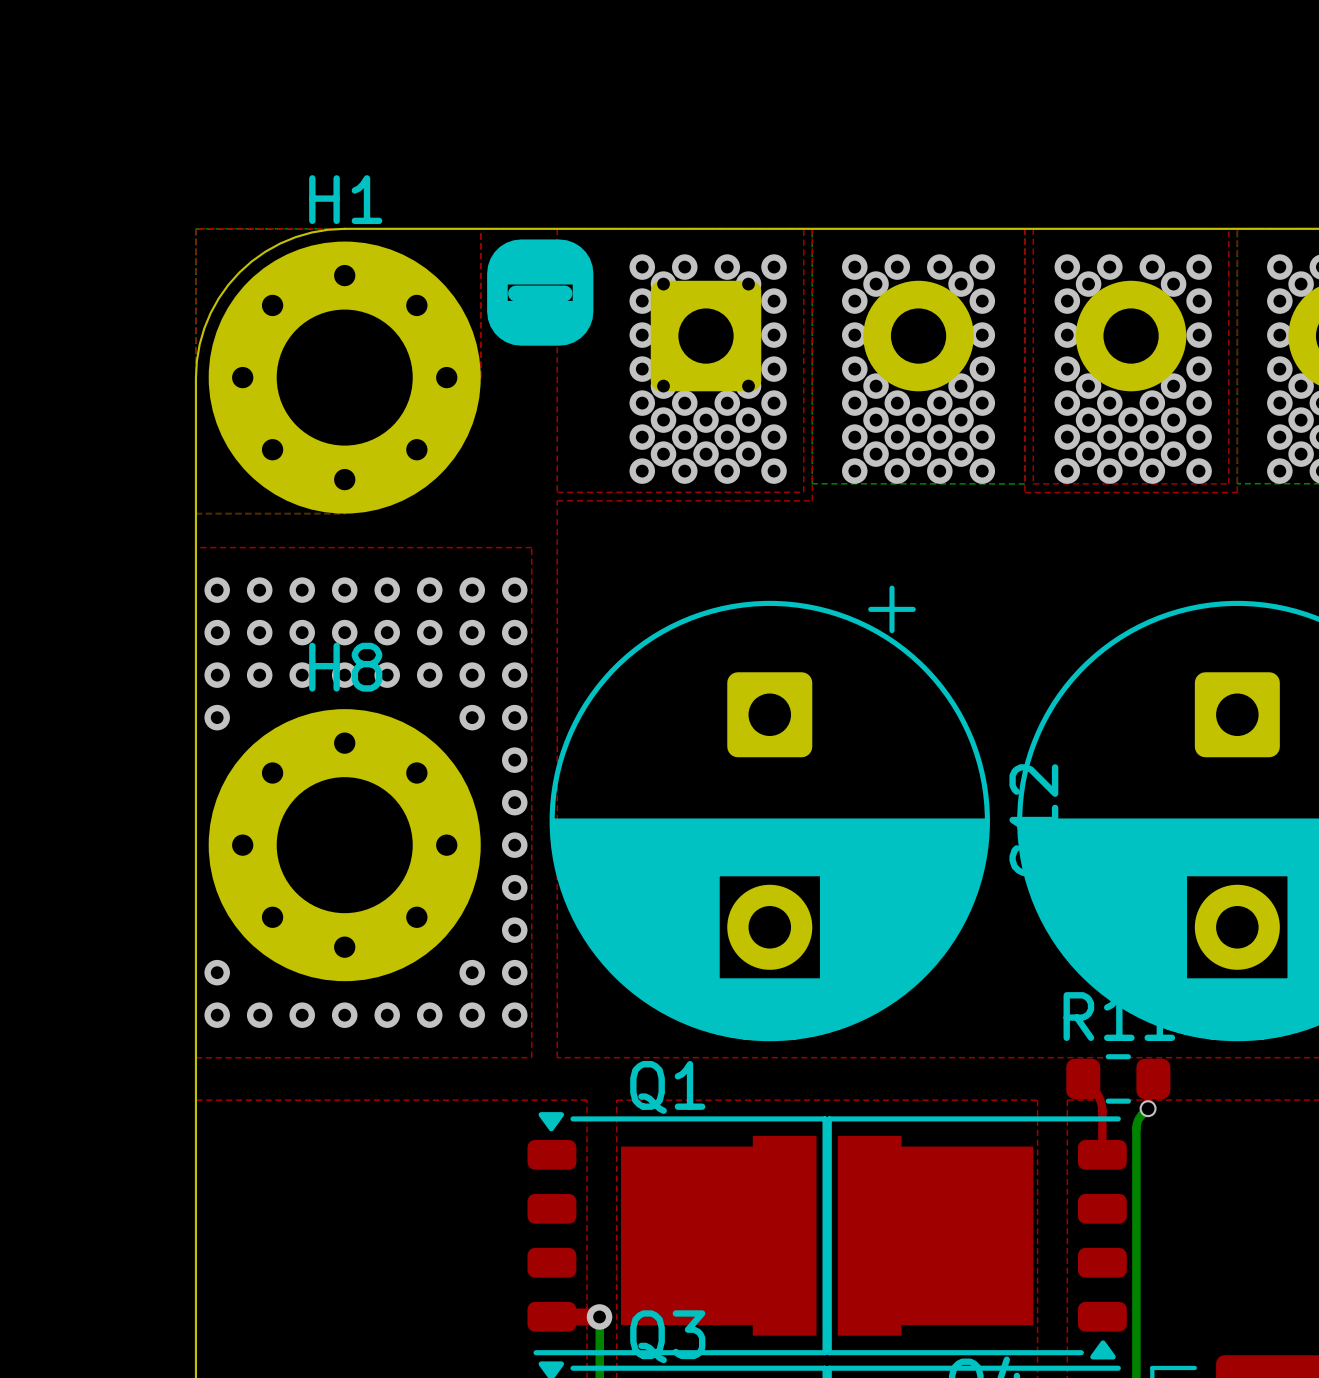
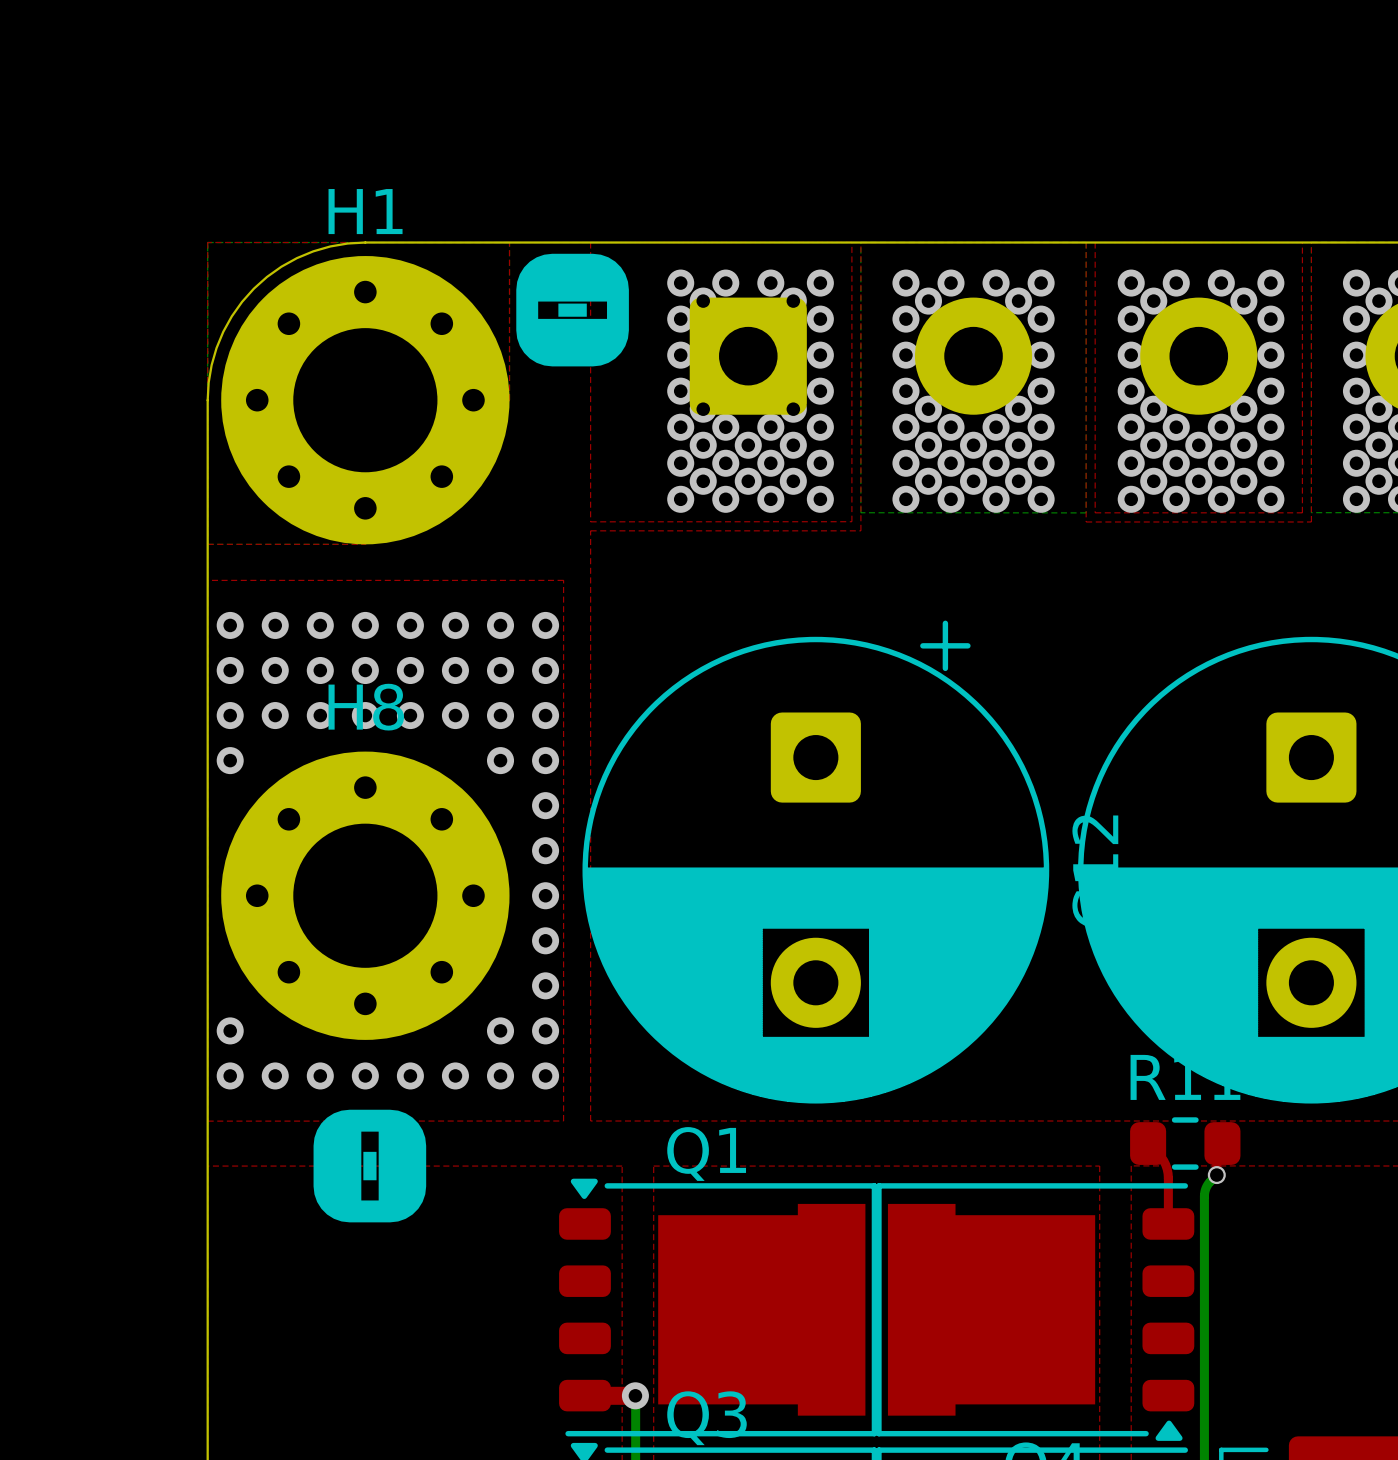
drawing: none -> [313, 1109, 427, 1223]
text: none -> - (369, 1166)

